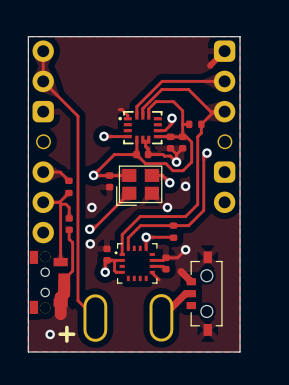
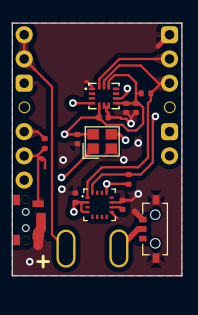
part: (69, 224) -> none
track: (69, 229) (69, 239) (72, 242) (72, 271) (64, 279) (64, 282) -> none

